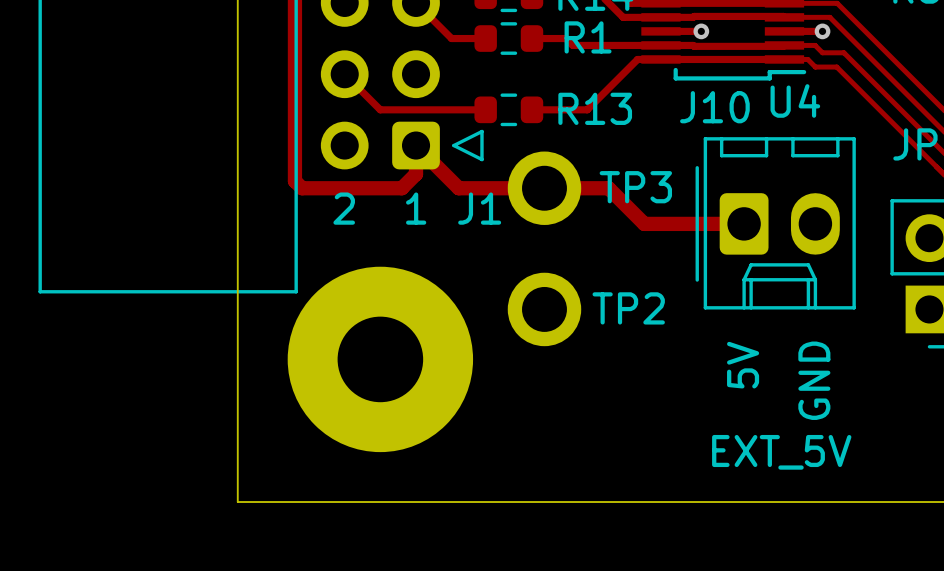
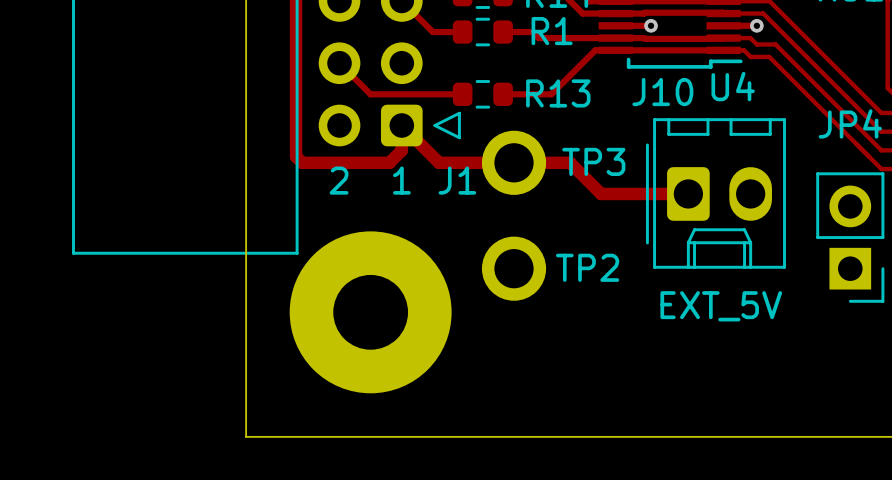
text: 5V (743, 365) -> none
text: GND (814, 380) -> none
text position: EXT_5V (781, 452) -> EXT_5V (721, 306)

